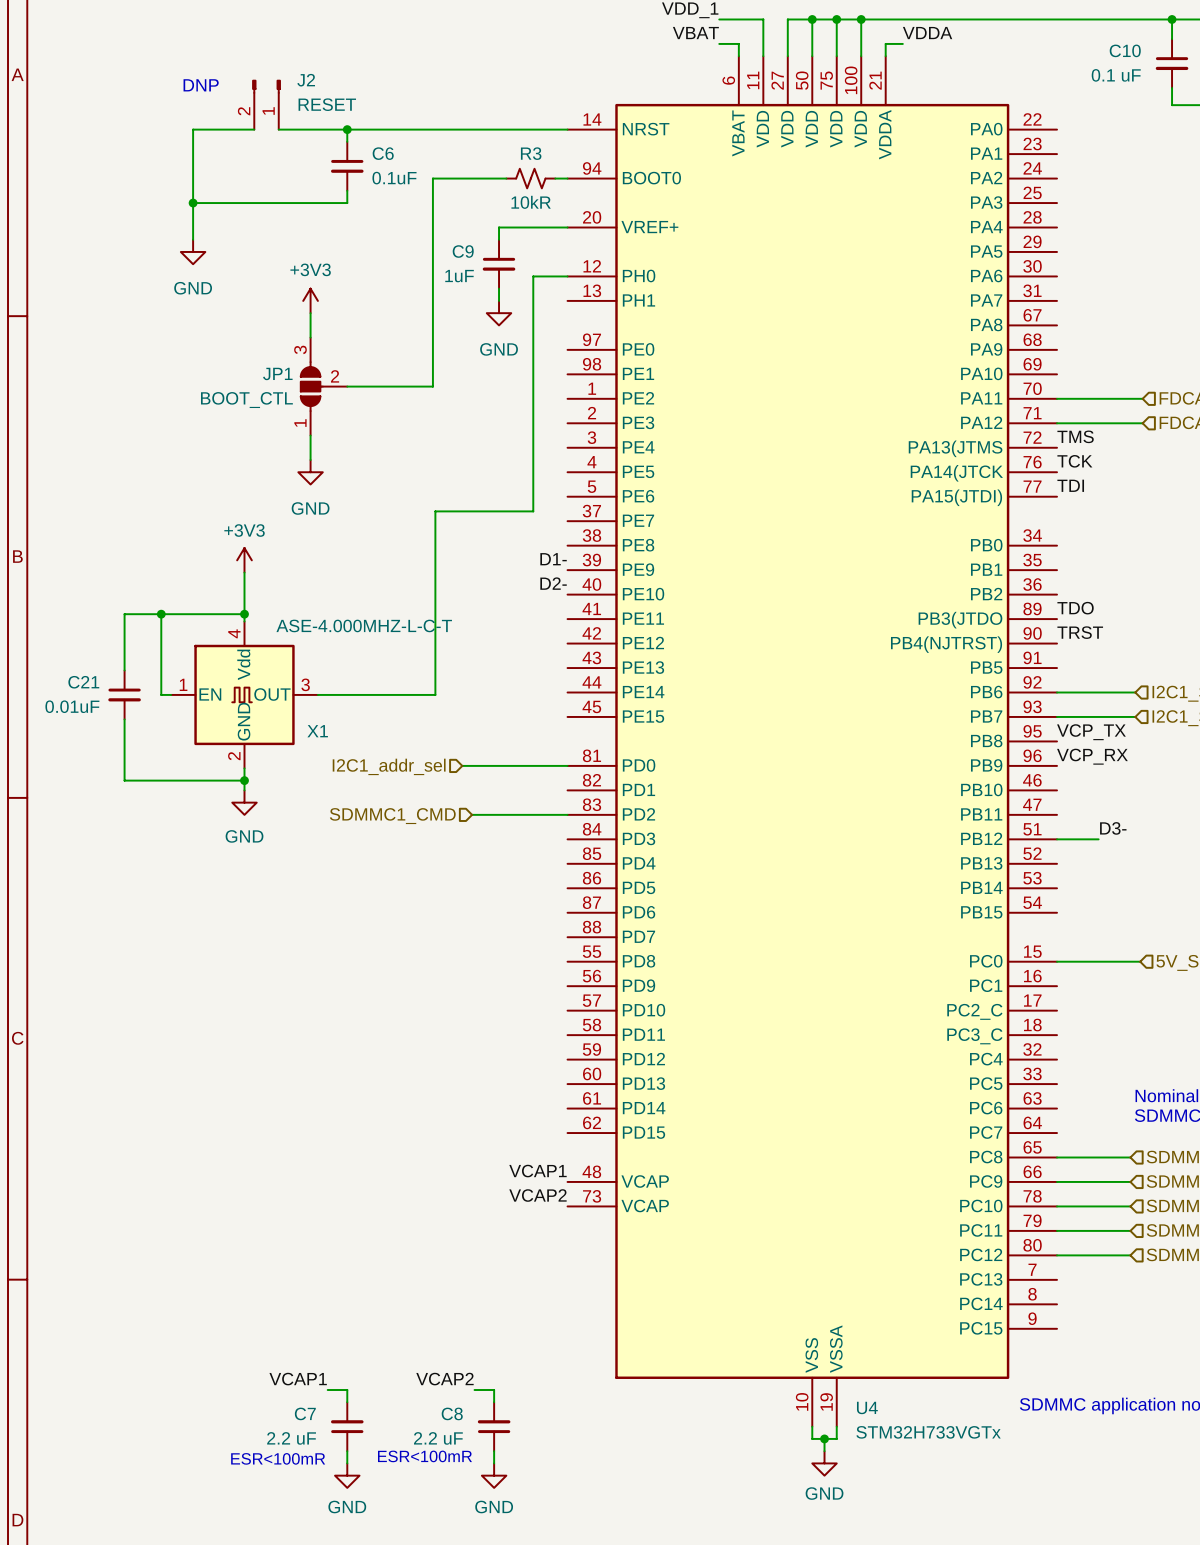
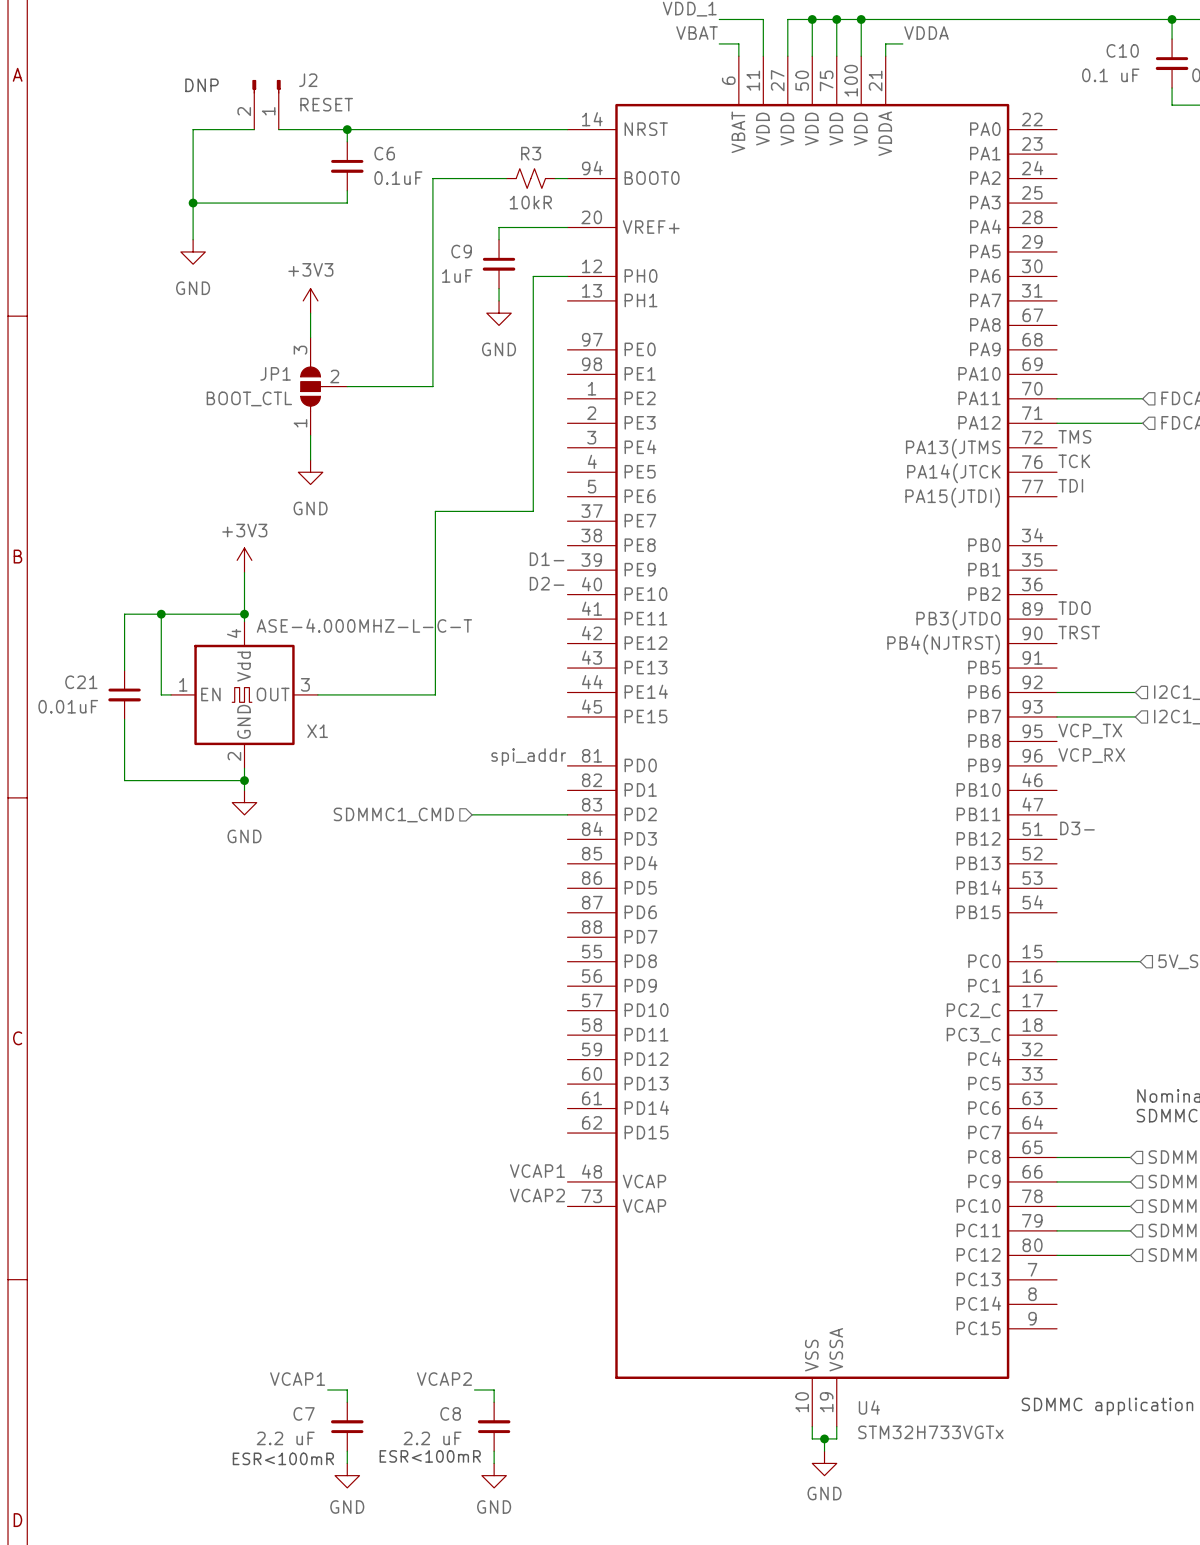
label: none -> spi_addr (528, 757)
wire: (462, 765) (567, 765) -> none
hierarchical label: I2C1_addr_sel (389, 766) -> none
label position: D3- (1113, 828) -> D3- (1077, 828)
wire: (1057, 839) (1098, 839) -> none

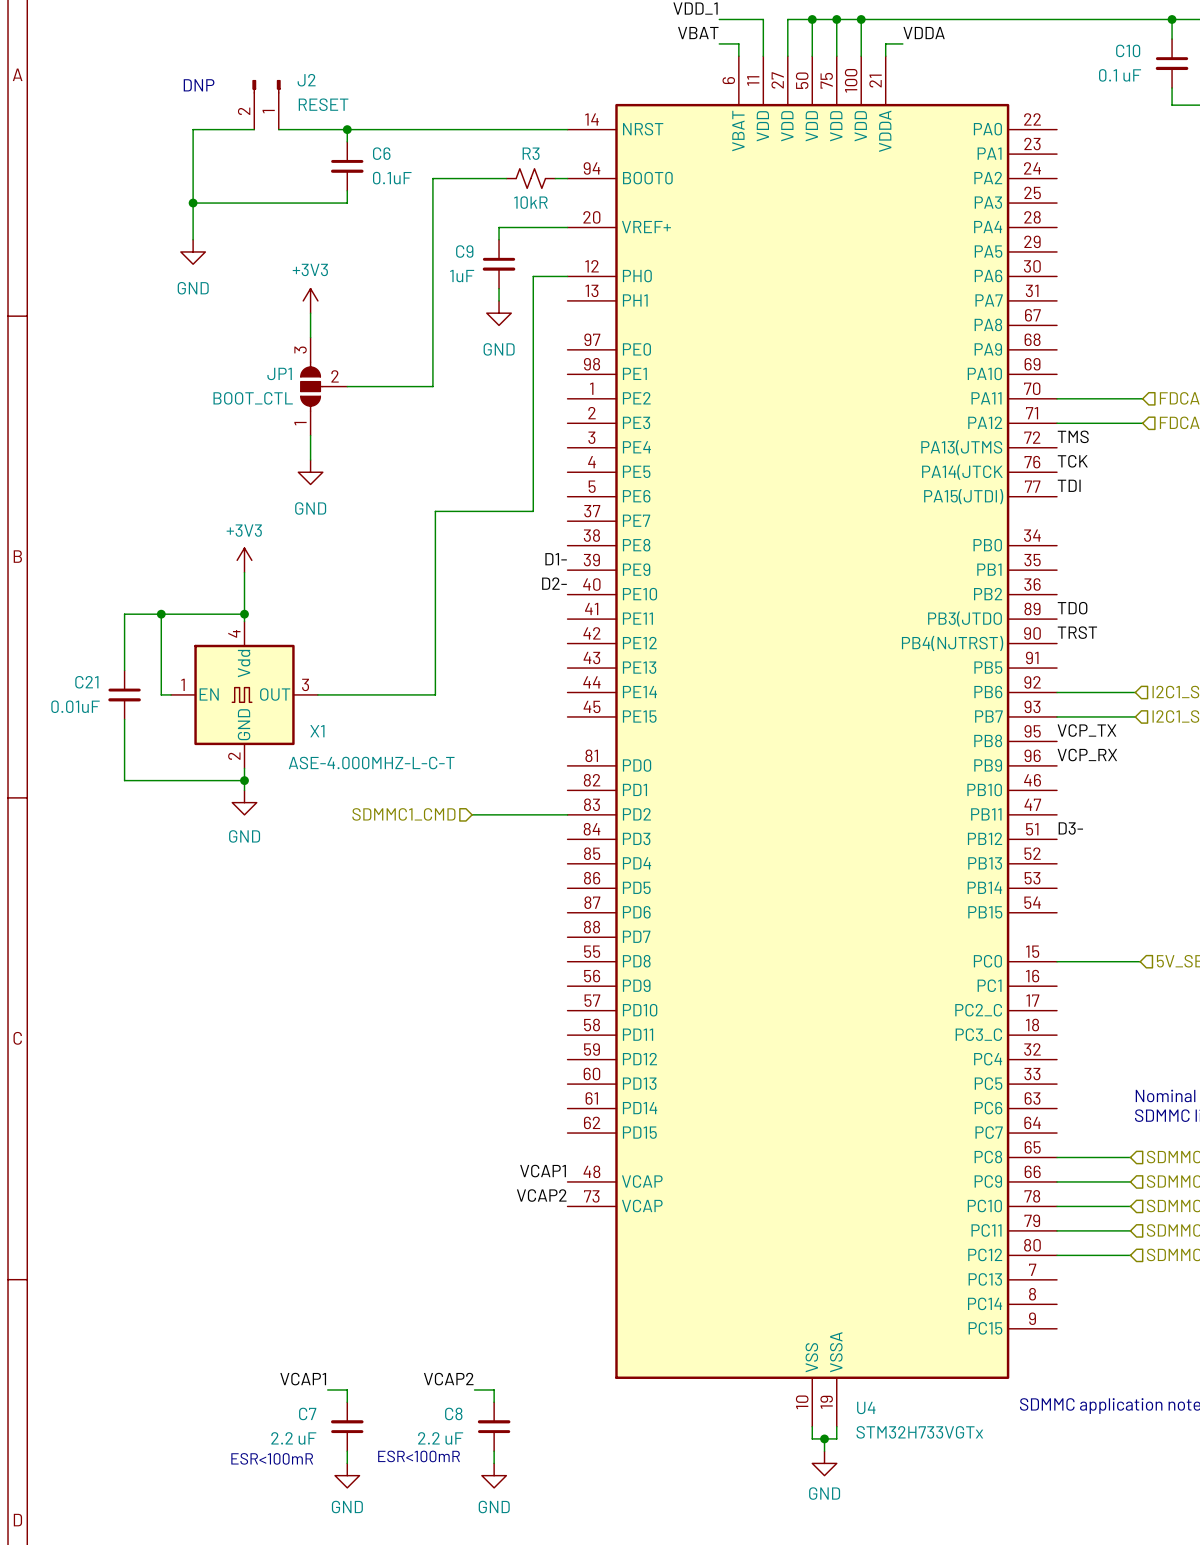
X1 value position: ASE-4.000MHZ-L-C-T (364, 625) -> ASE-4.000MHZ-L-C-T (371, 763)
label: spi_addr (528, 757) -> none

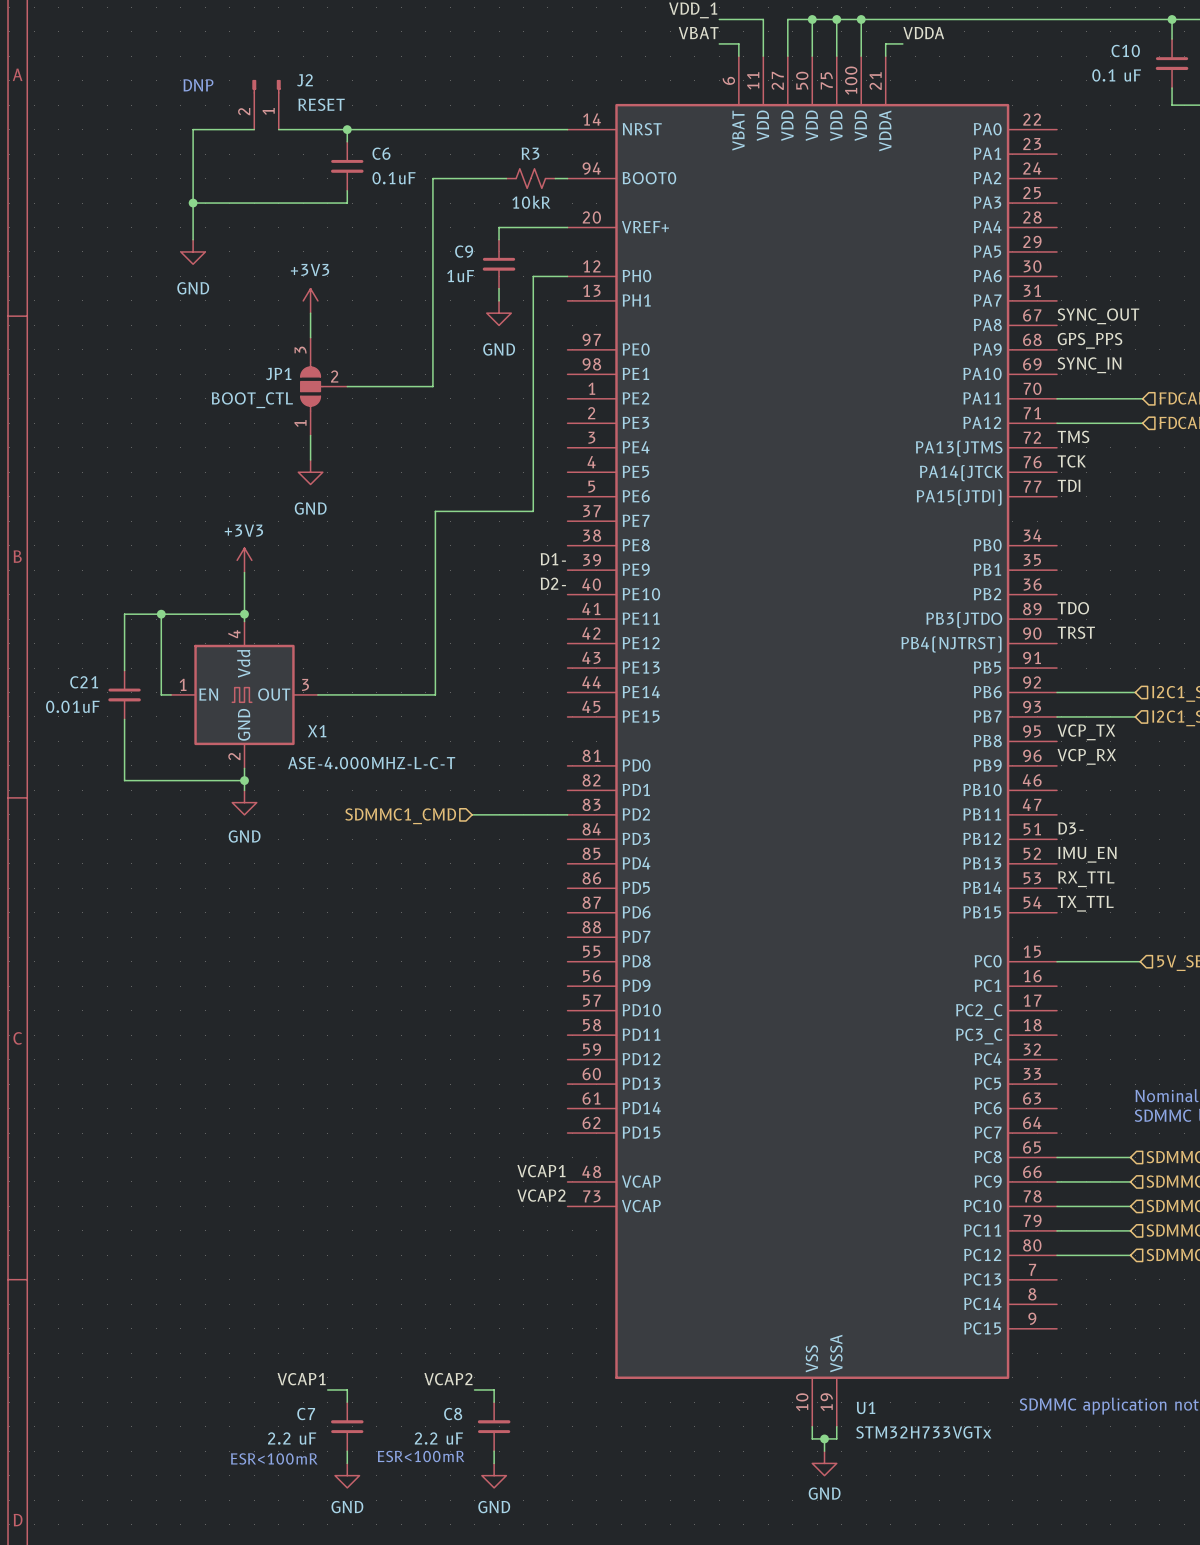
label: none -> SYNC_OUT (1098, 316)
label: none -> GPS_PPS (1090, 340)
label: none -> SYNC_IN (1089, 365)
label: none -> IMU_EN (1087, 854)
label: none -> RX_TTL (1086, 879)
label: none -> TX_TTL (1085, 903)
U4 name: U4 (866, 1407) -> U1 (866, 1407)

